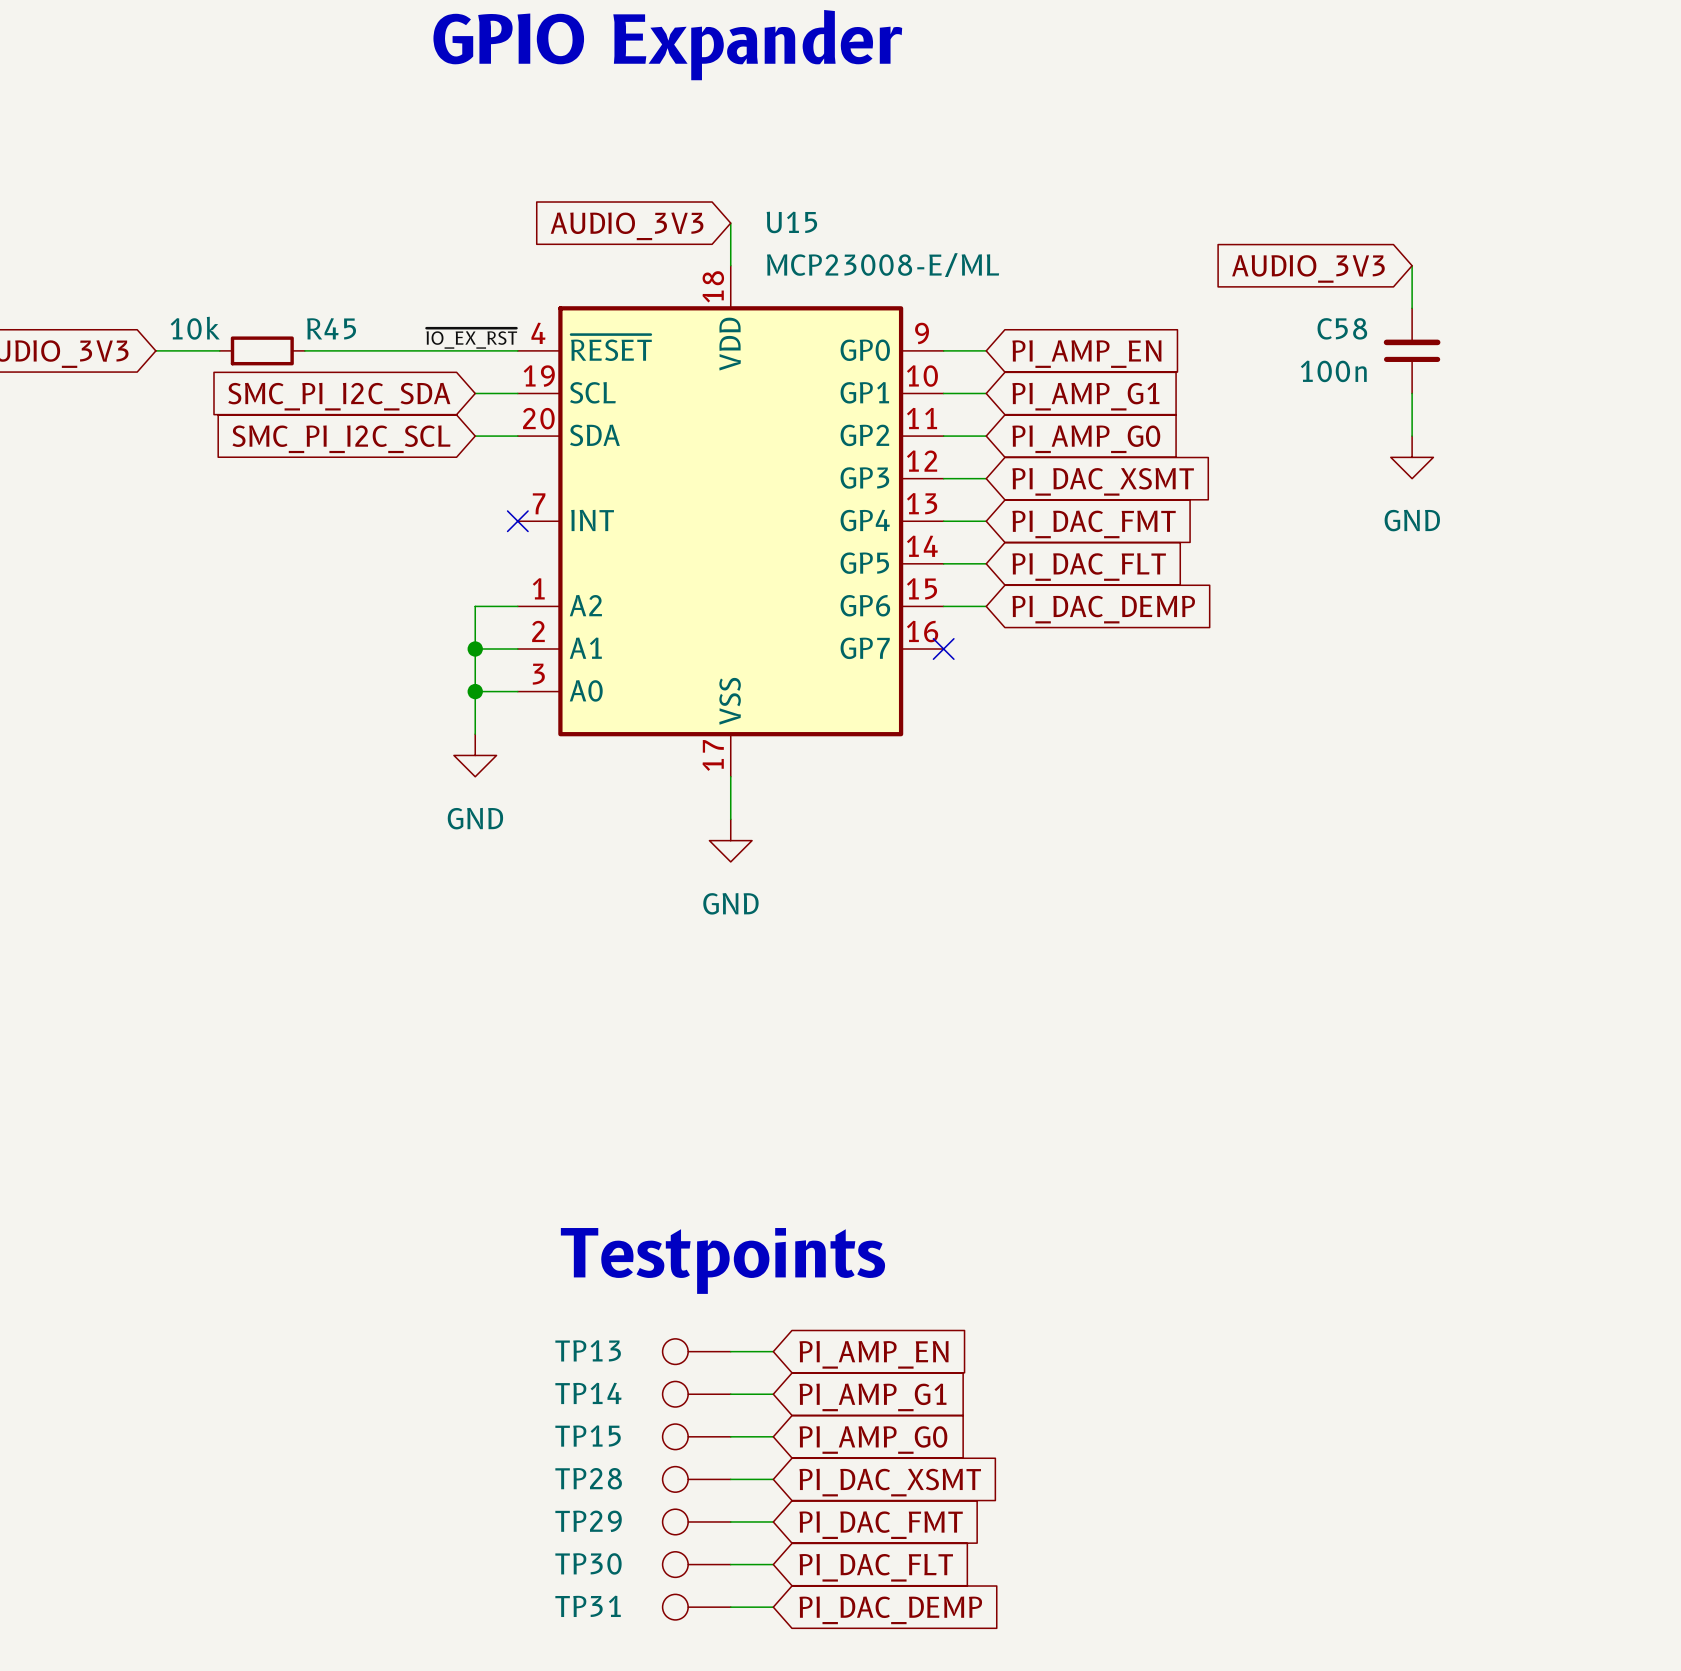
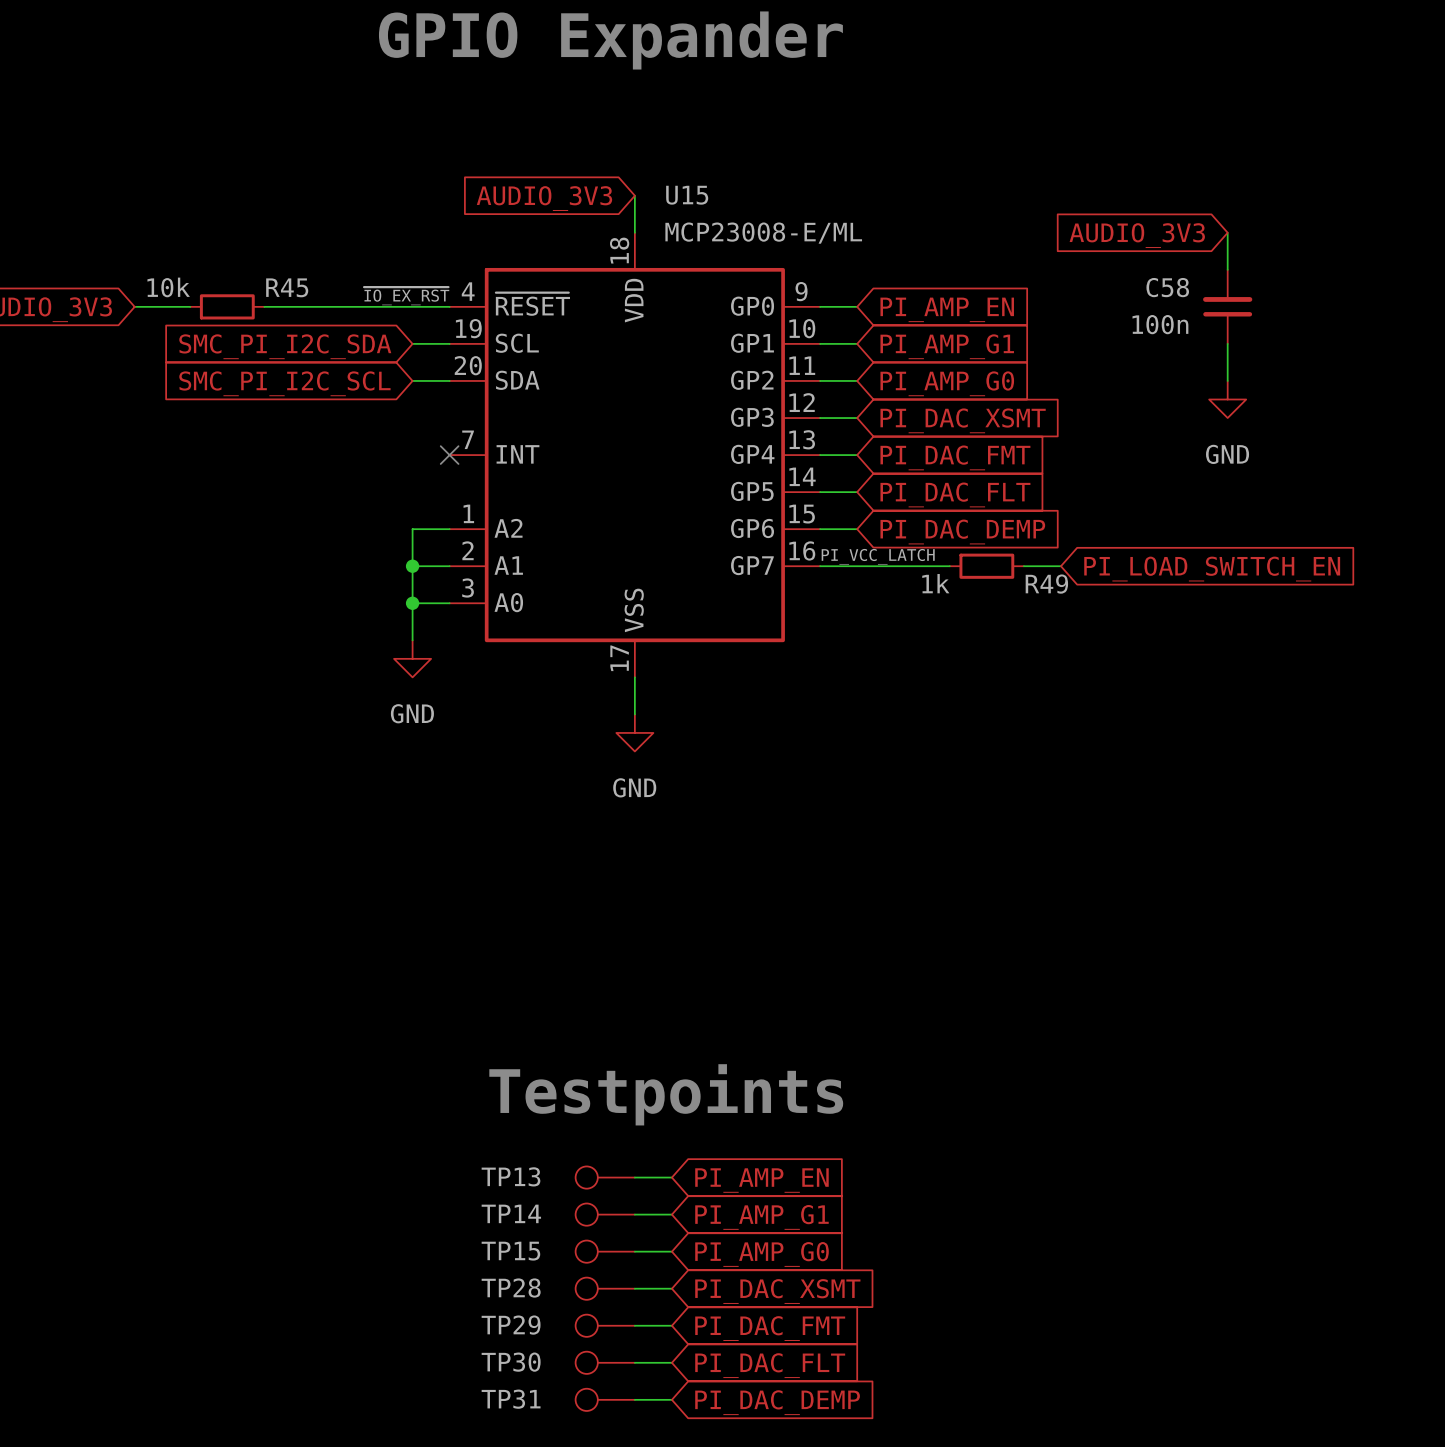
label: none -> PI_VCC_LATCH (878, 556)
wire: none -> (820, 566) (949, 566)
no-connect mark: (943, 649) -> none
R49: none -> 1k (986, 566)
wire: none -> (1023, 566) (1060, 566)
global label: none -> PI_LOAD_SWITCH_EN (1212, 569)

